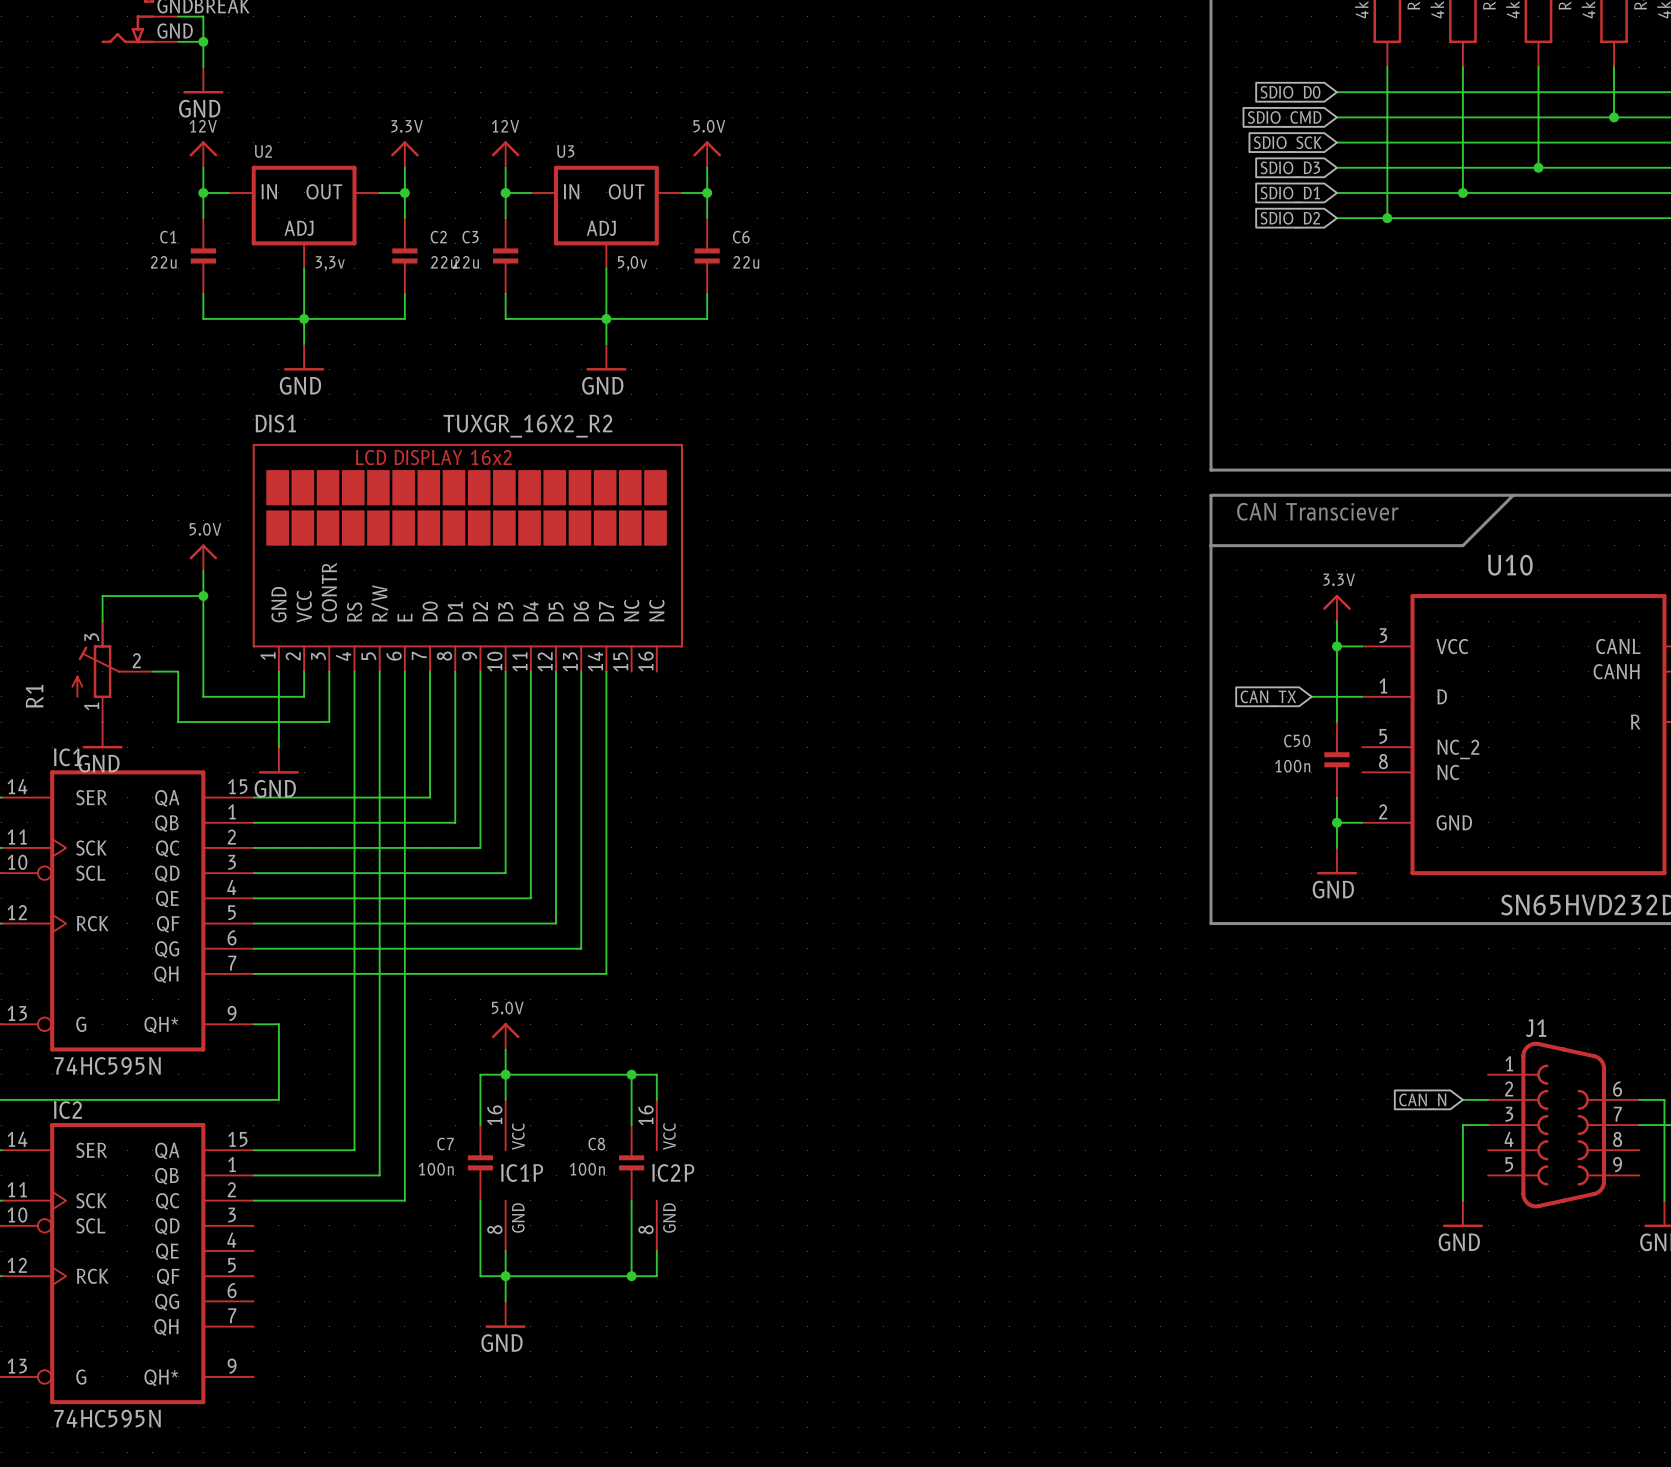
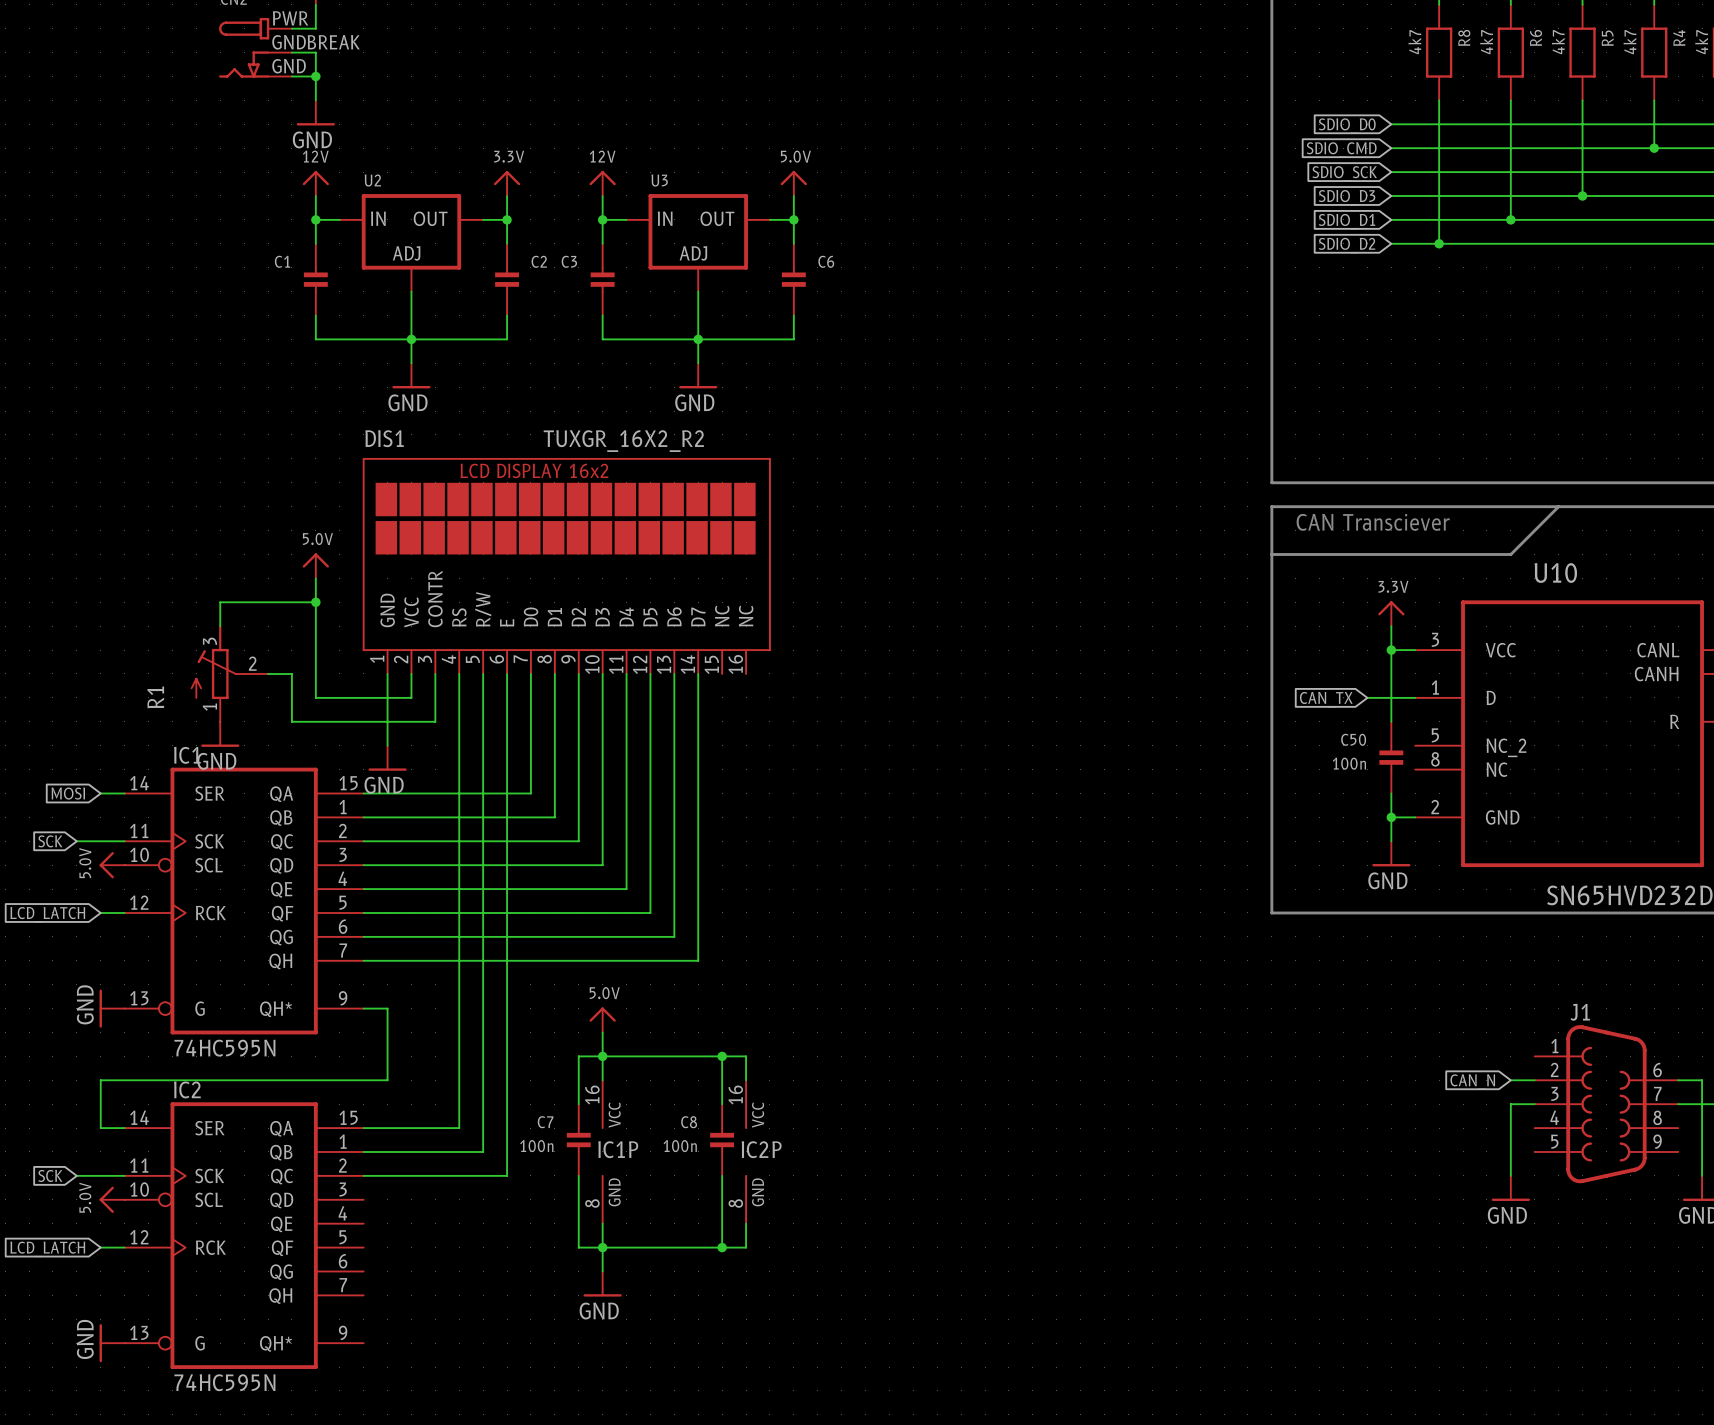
C1 value: 22u (163, 262) -> none
C2 value: 22u (444, 262) -> none
C3 value: 22u (466, 262) -> none
C6 value: 22u (746, 262) -> none
U2 value: 3,3v (330, 263) -> none
U3 value: 5,0v (632, 263) -> none

